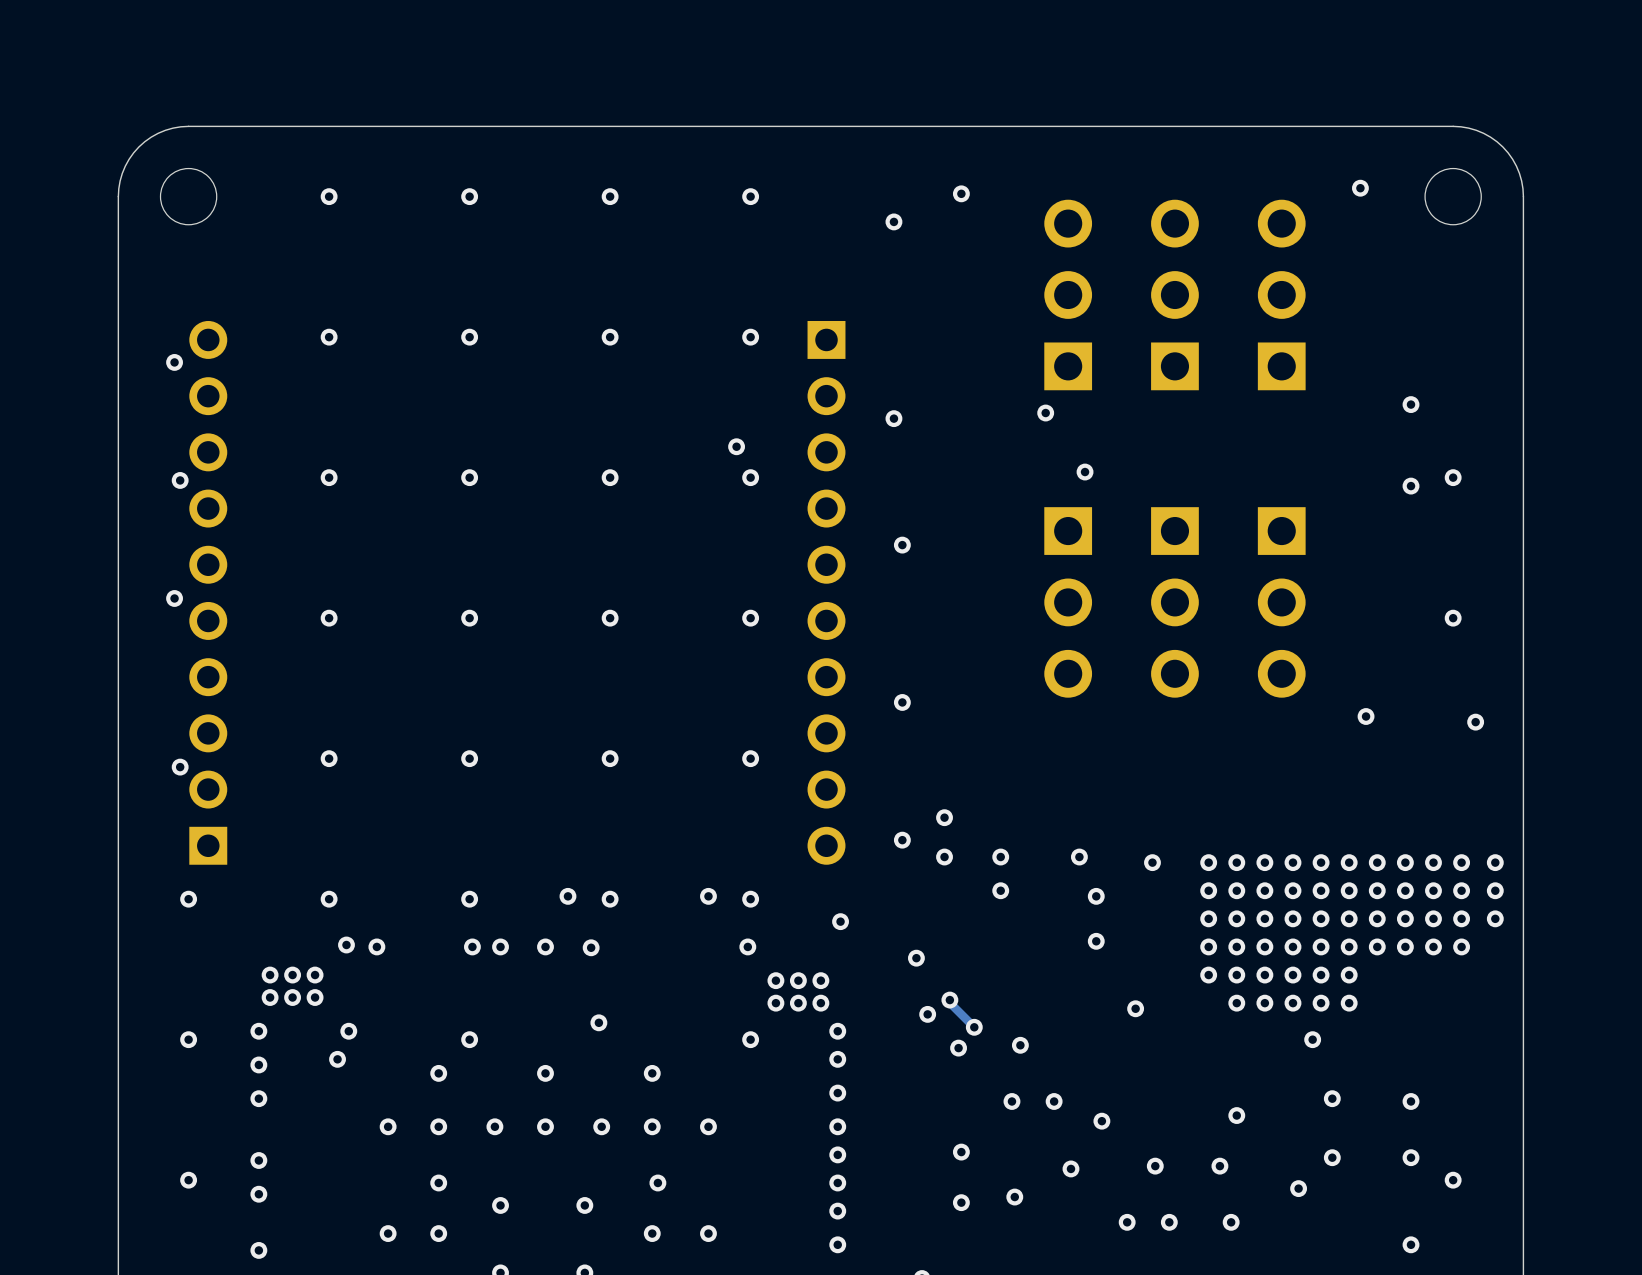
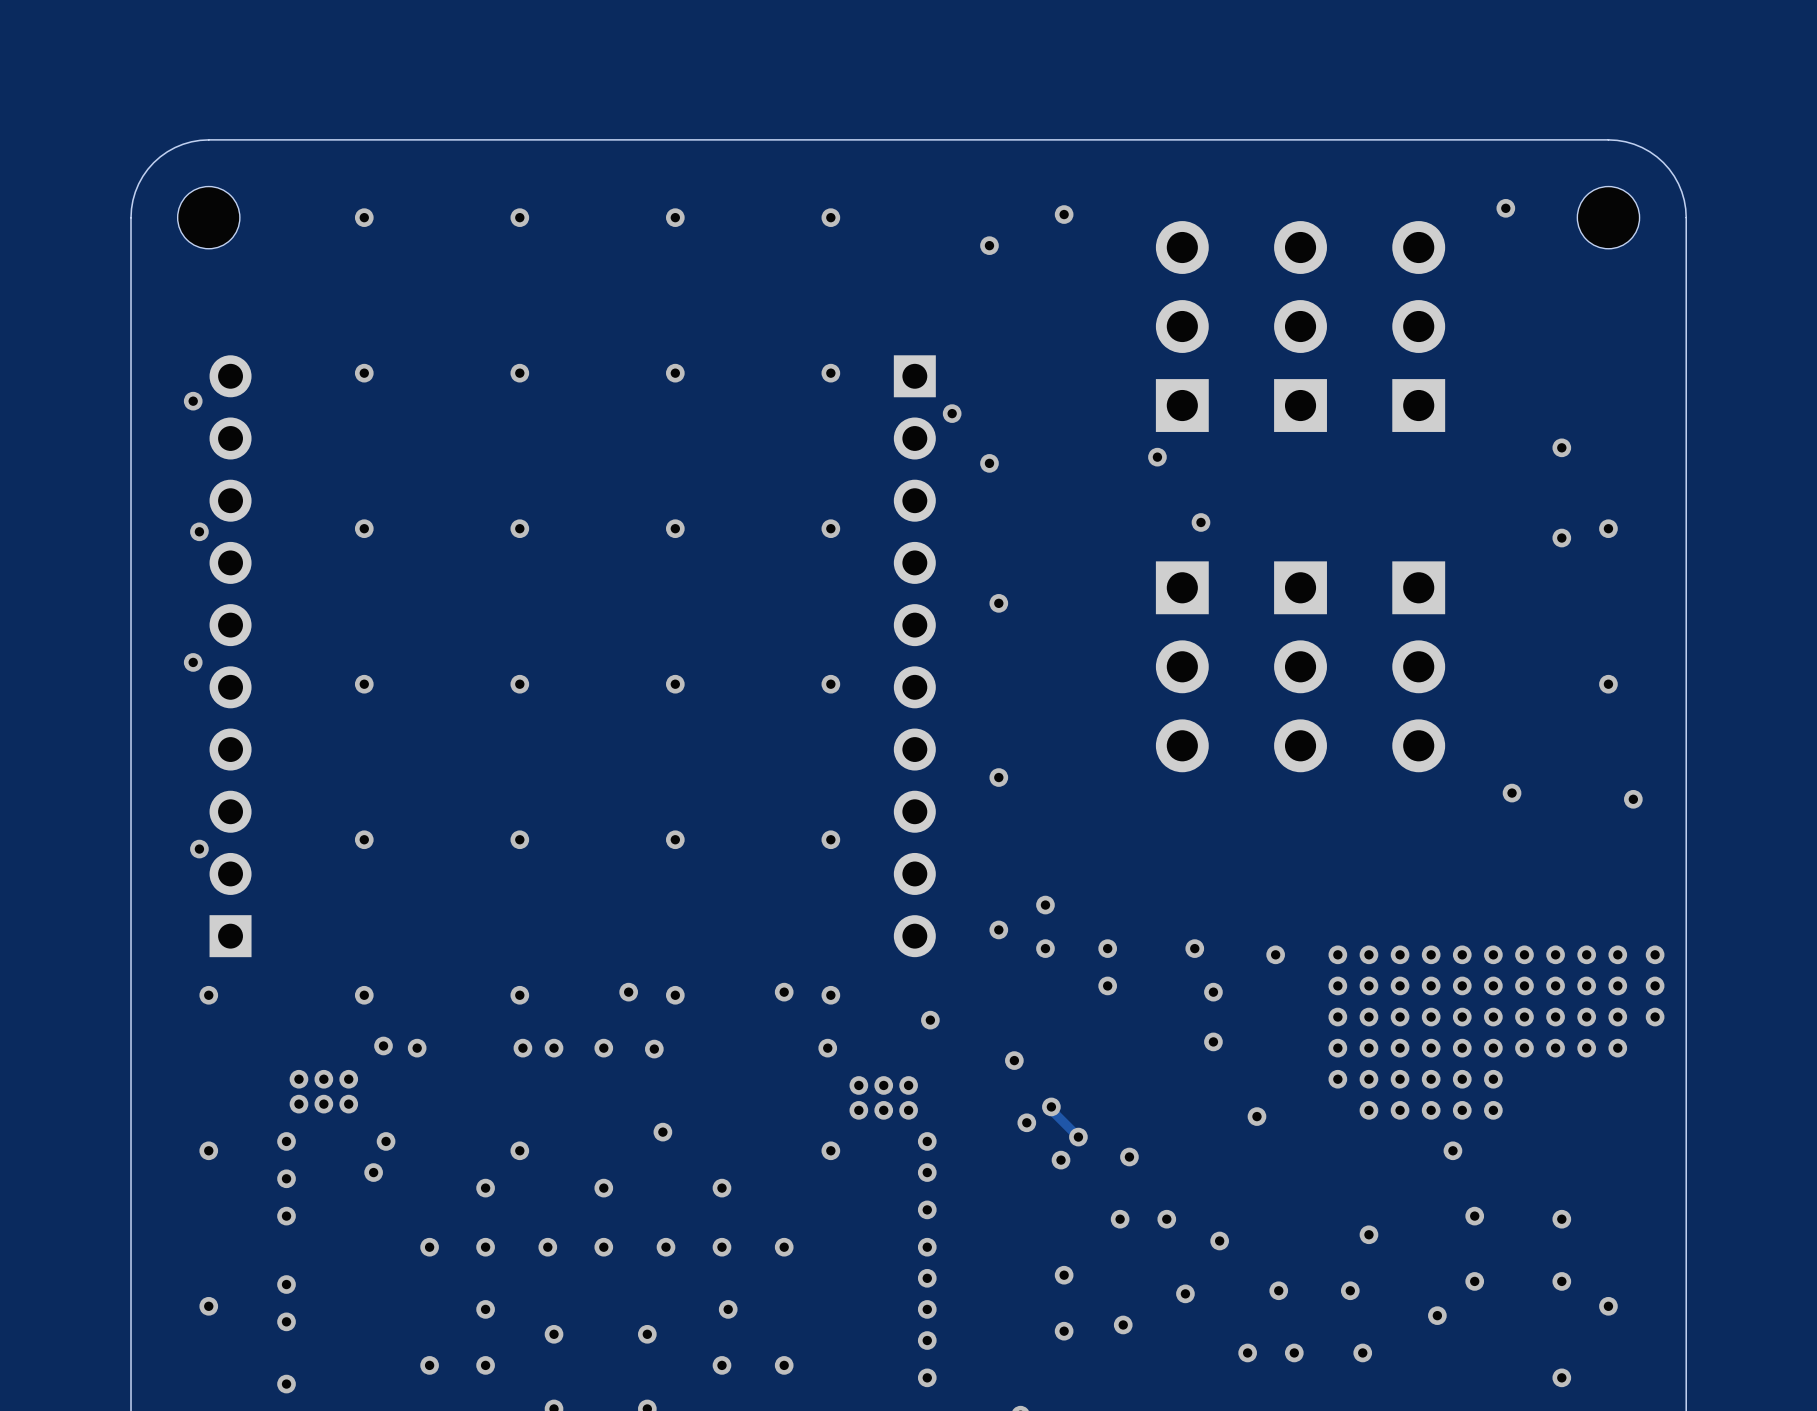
via position: (736, 446) -> (952, 413)

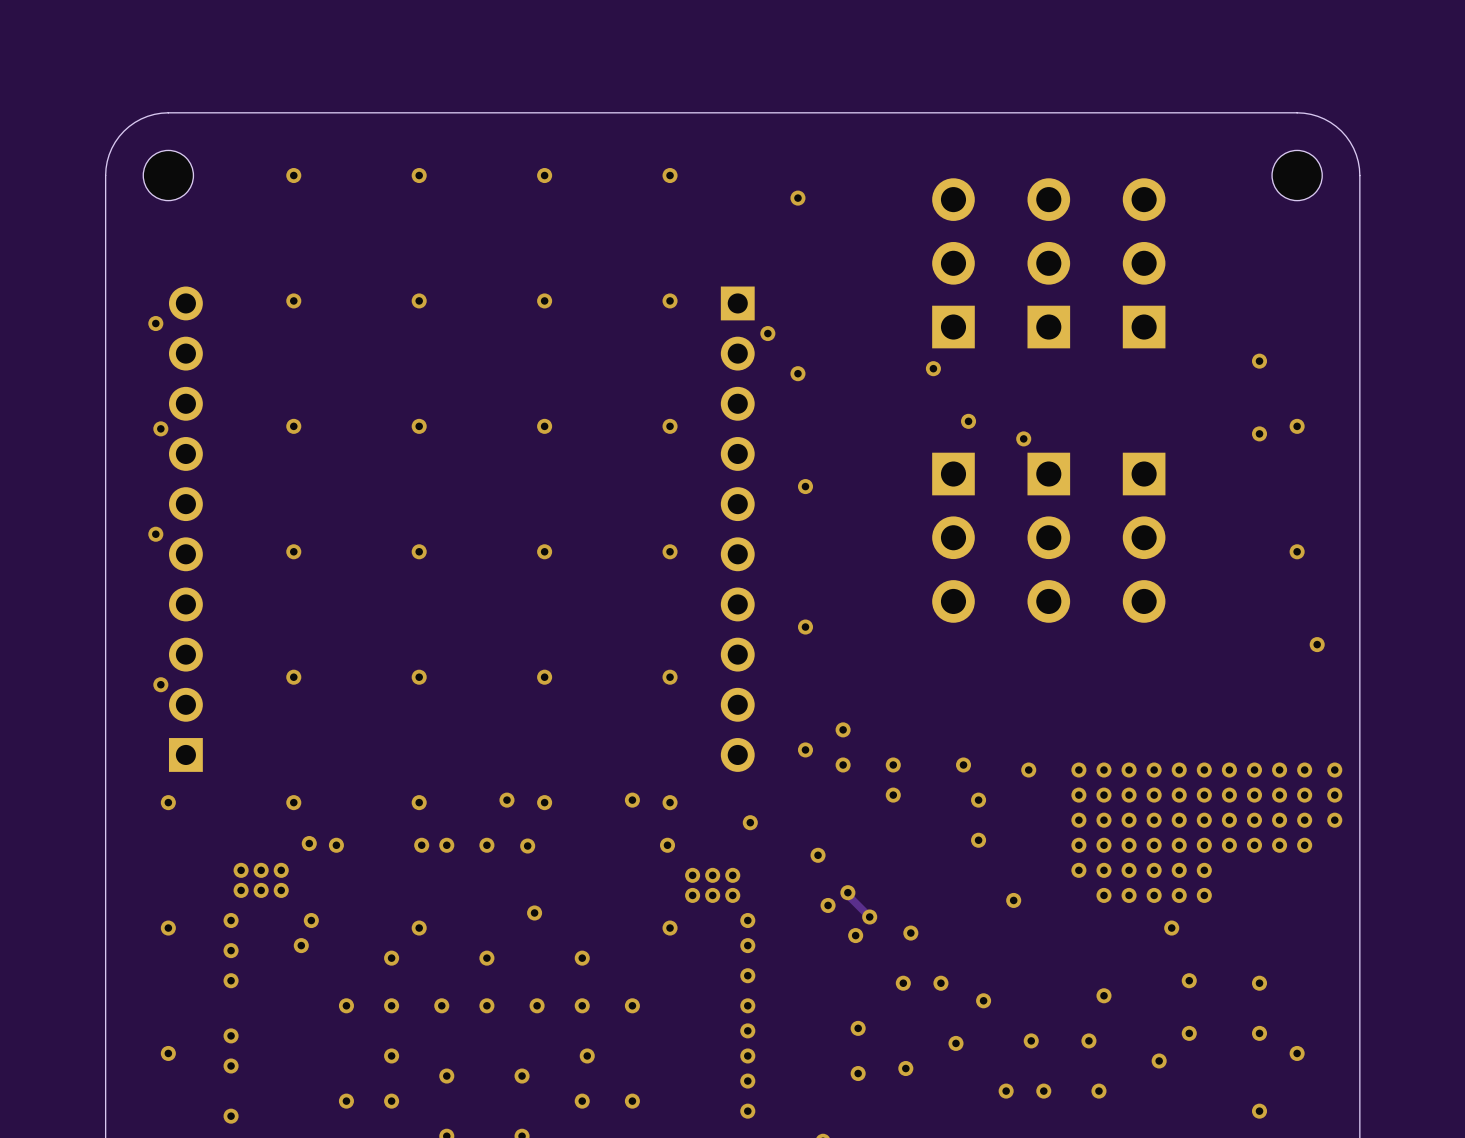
via: (1505, 208) -> none
via: (1064, 214) -> none
via: none -> (1023, 438)
via: (1512, 793) -> none

